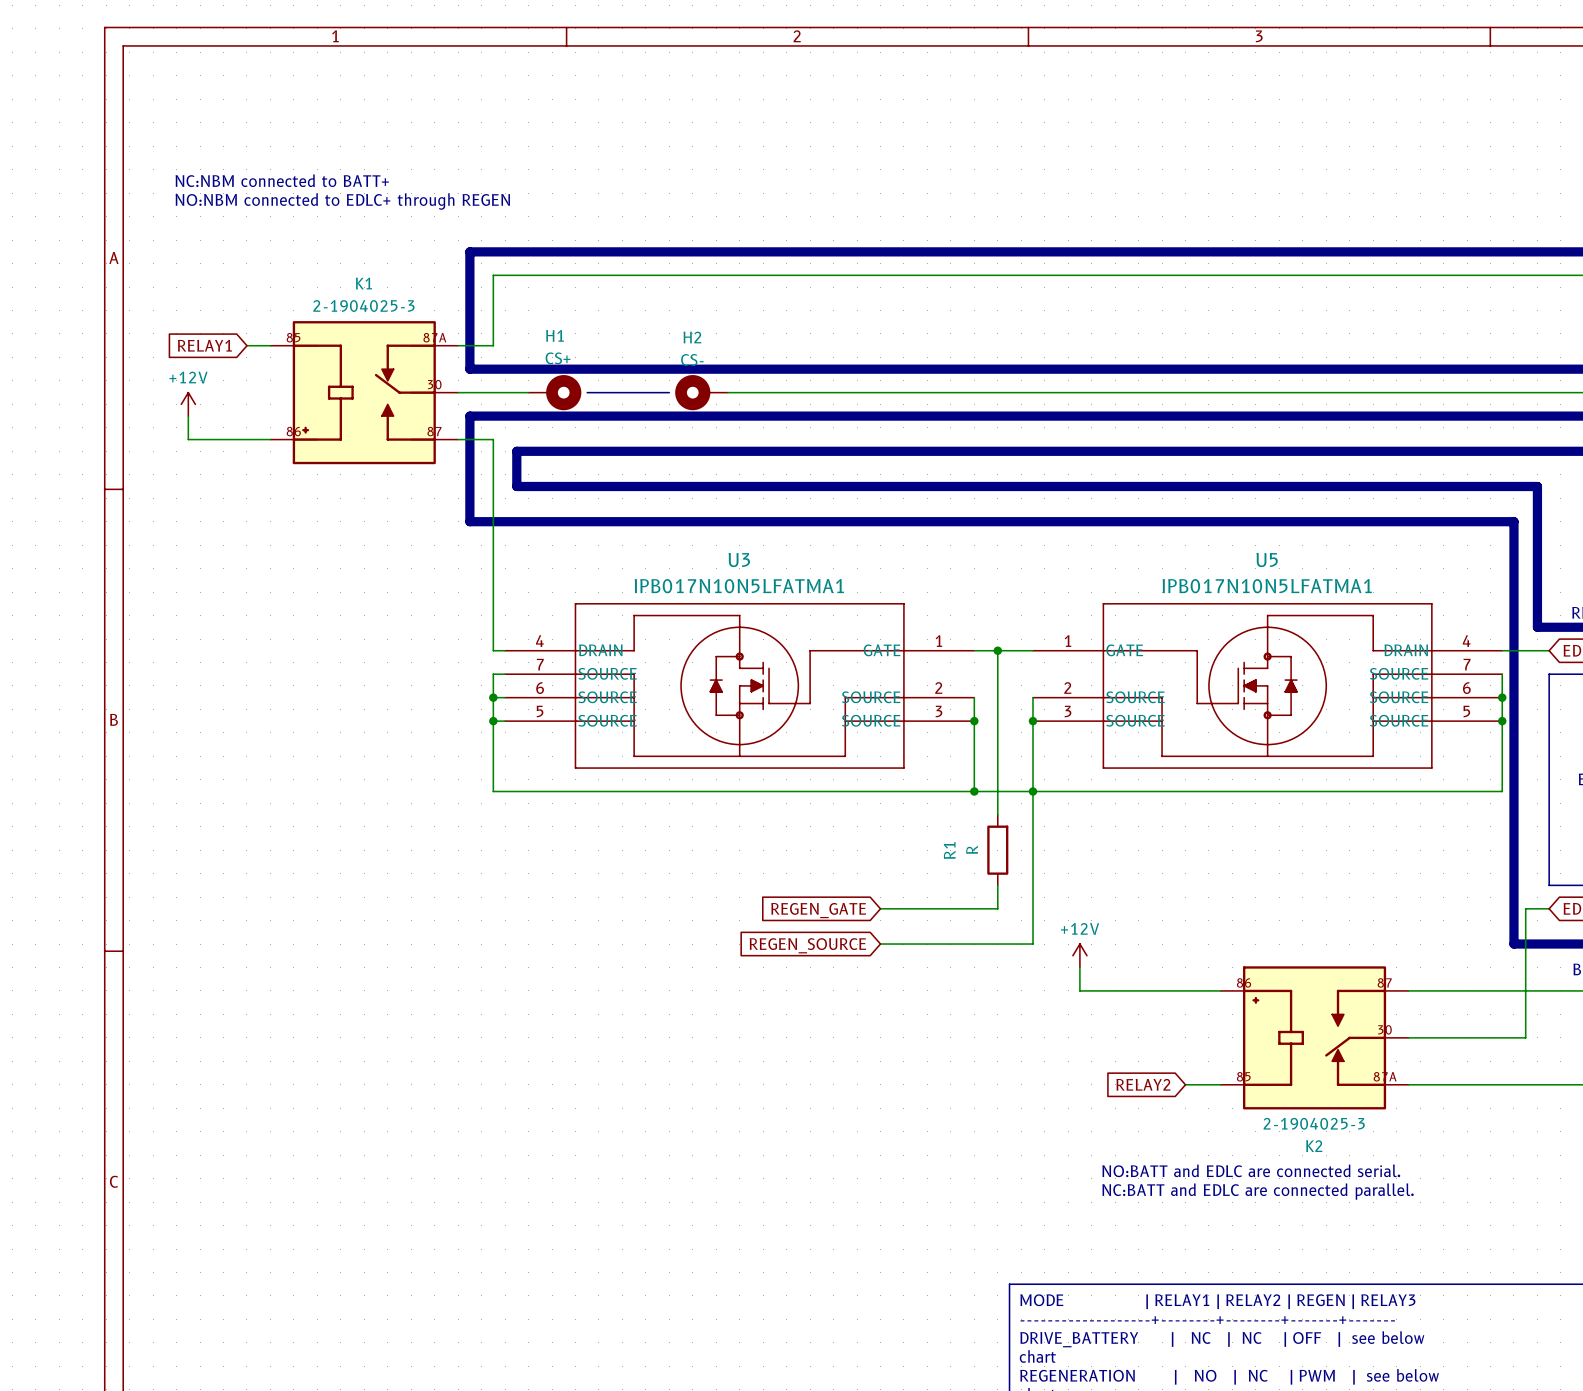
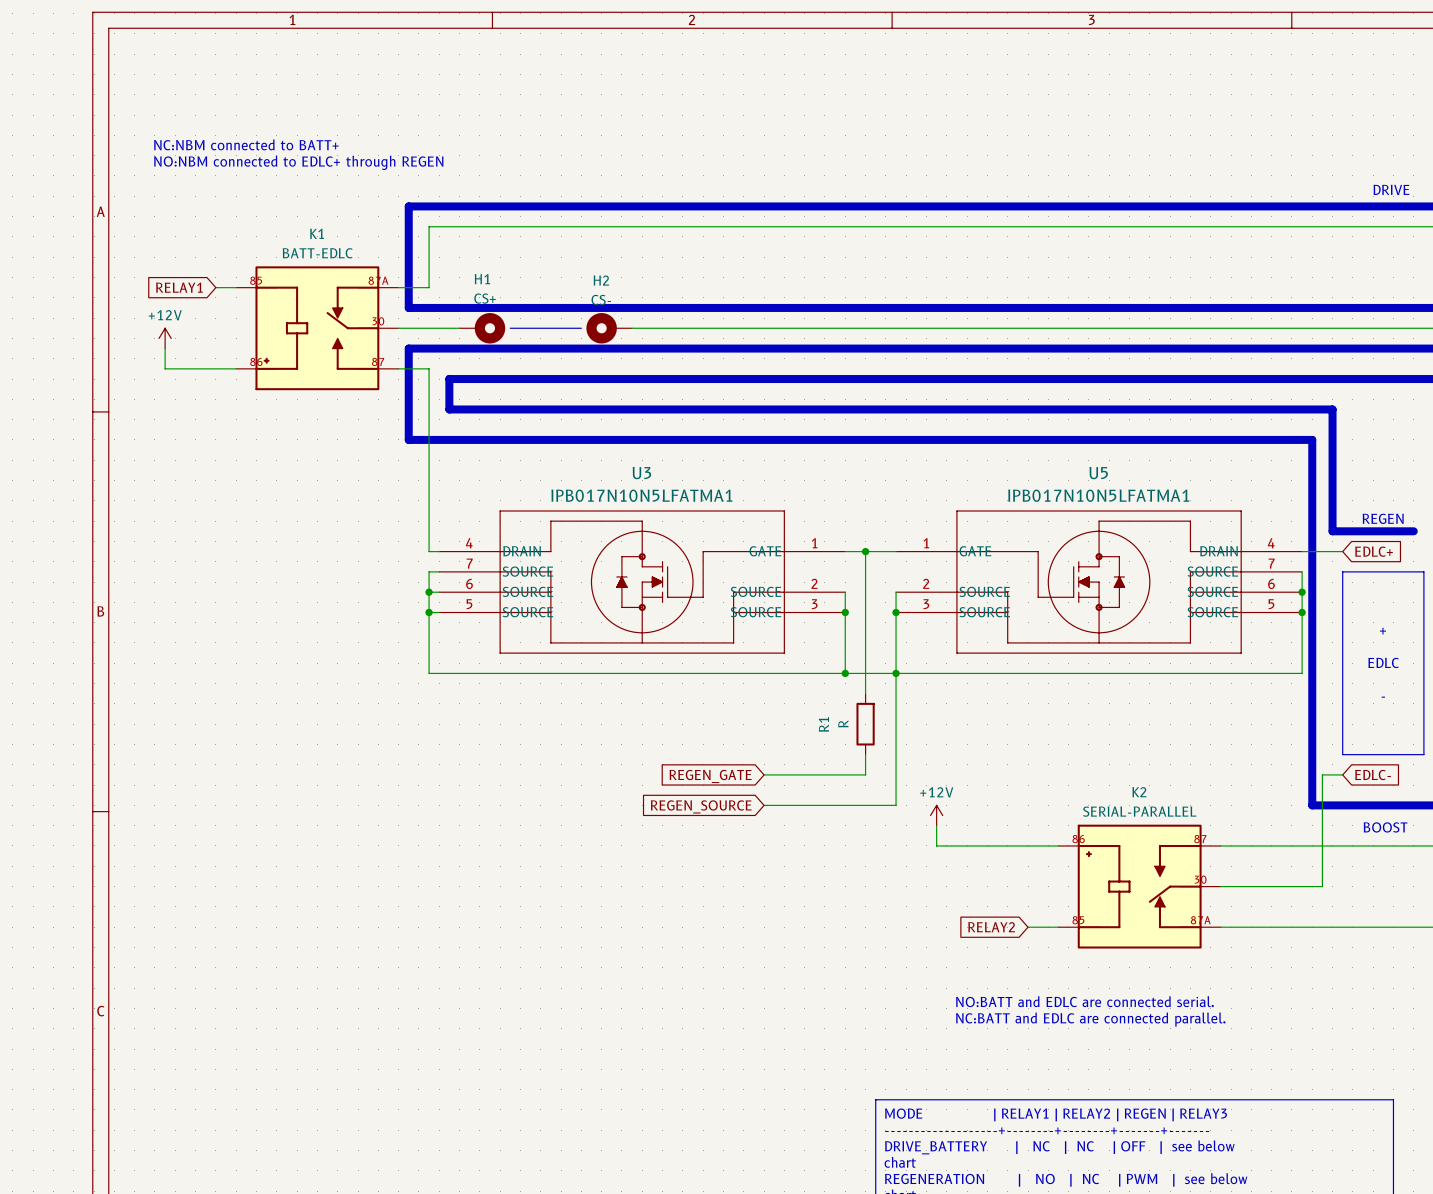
K1 value: 2-1904025-3 (363, 305) -> BATT-EDLC (317, 253)
K2 value: 2-1904025-3 (1314, 1123) -> SERIAL-PARALLEL (1139, 811)
K2 name position: K2 (1314, 1146) -> K2 (1139, 792)

